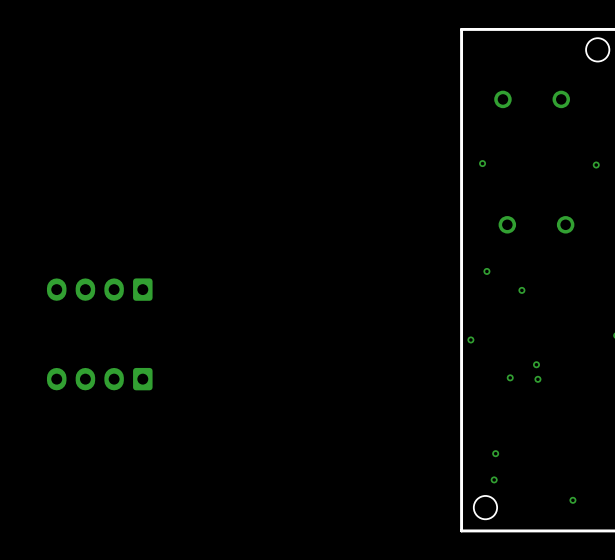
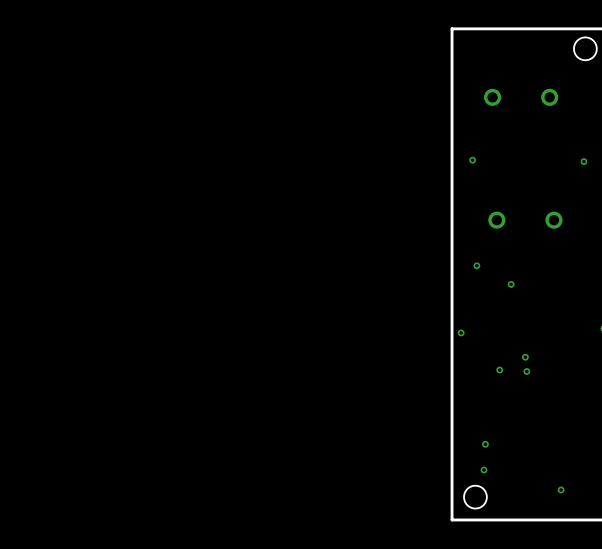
part: (99, 289) -> none
part: (99, 379) -> none

